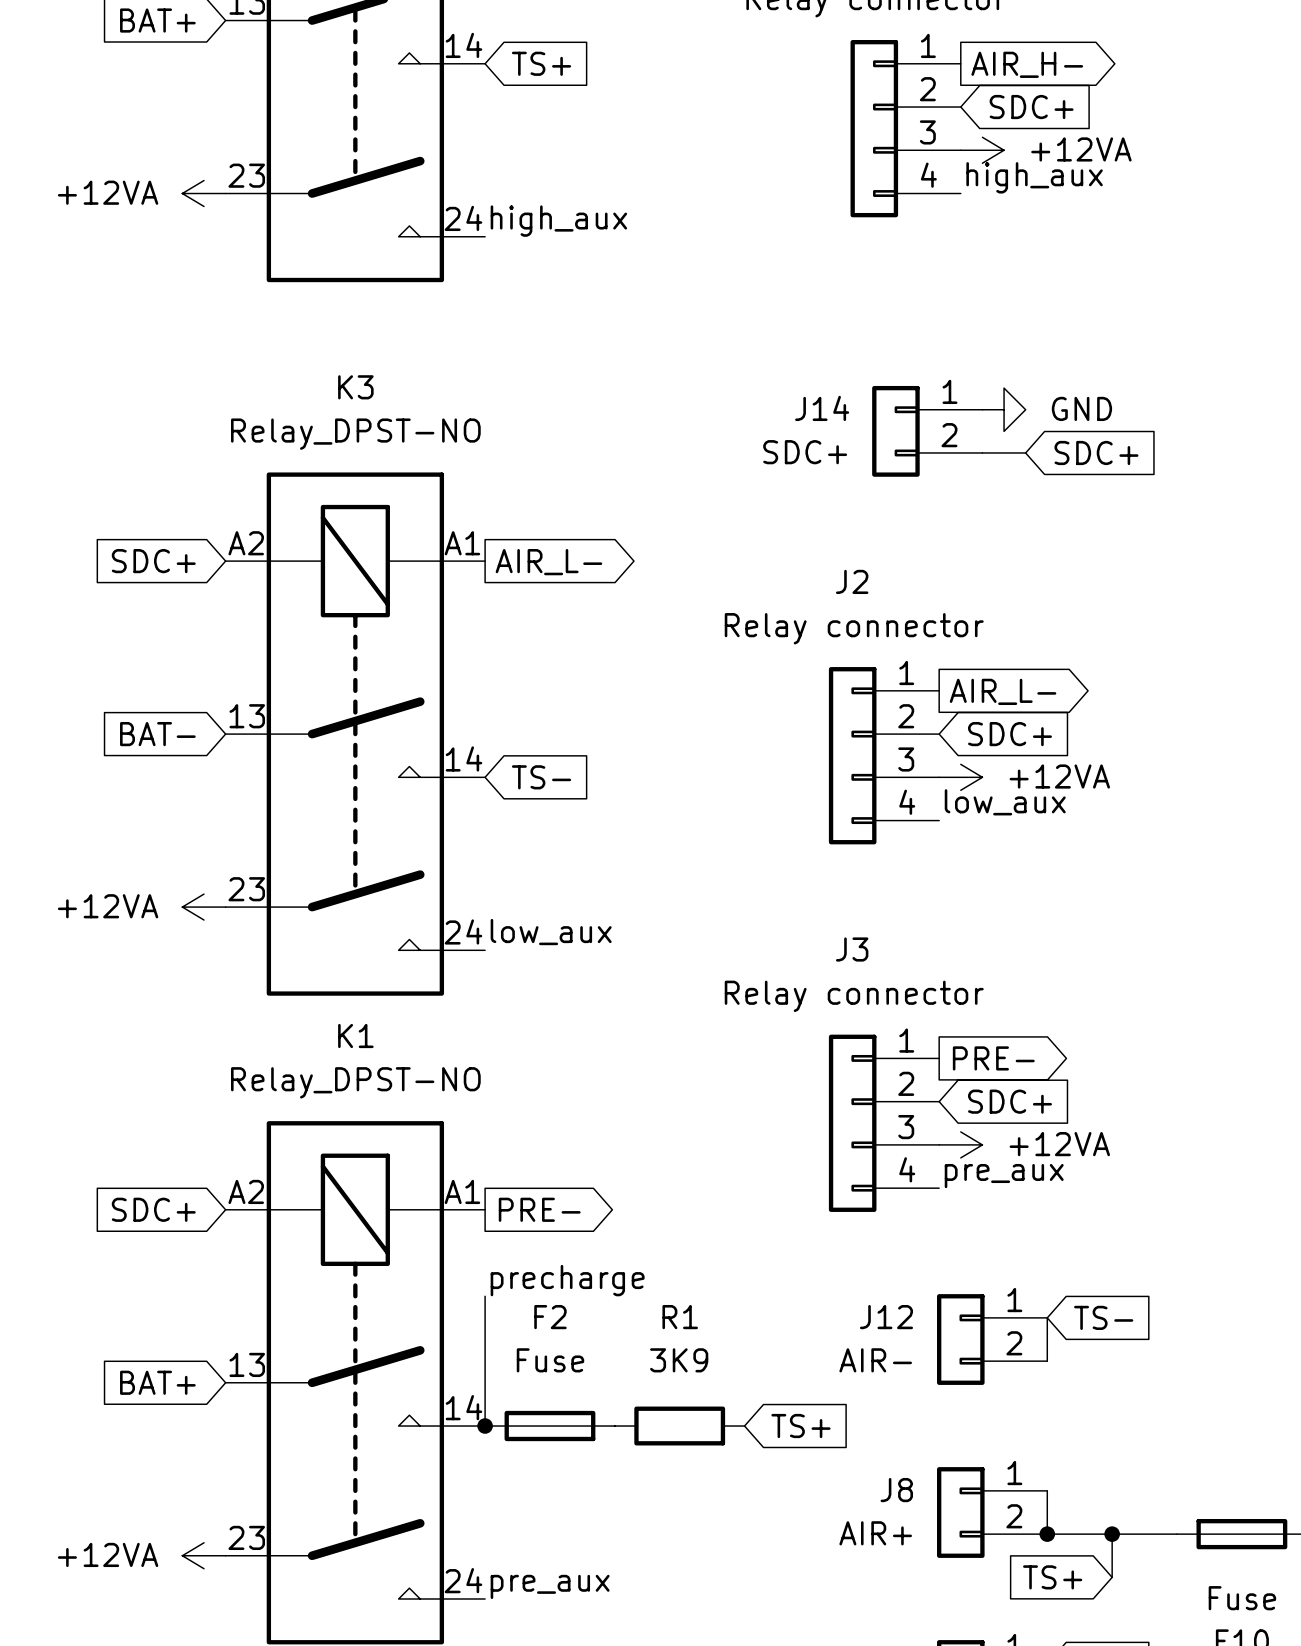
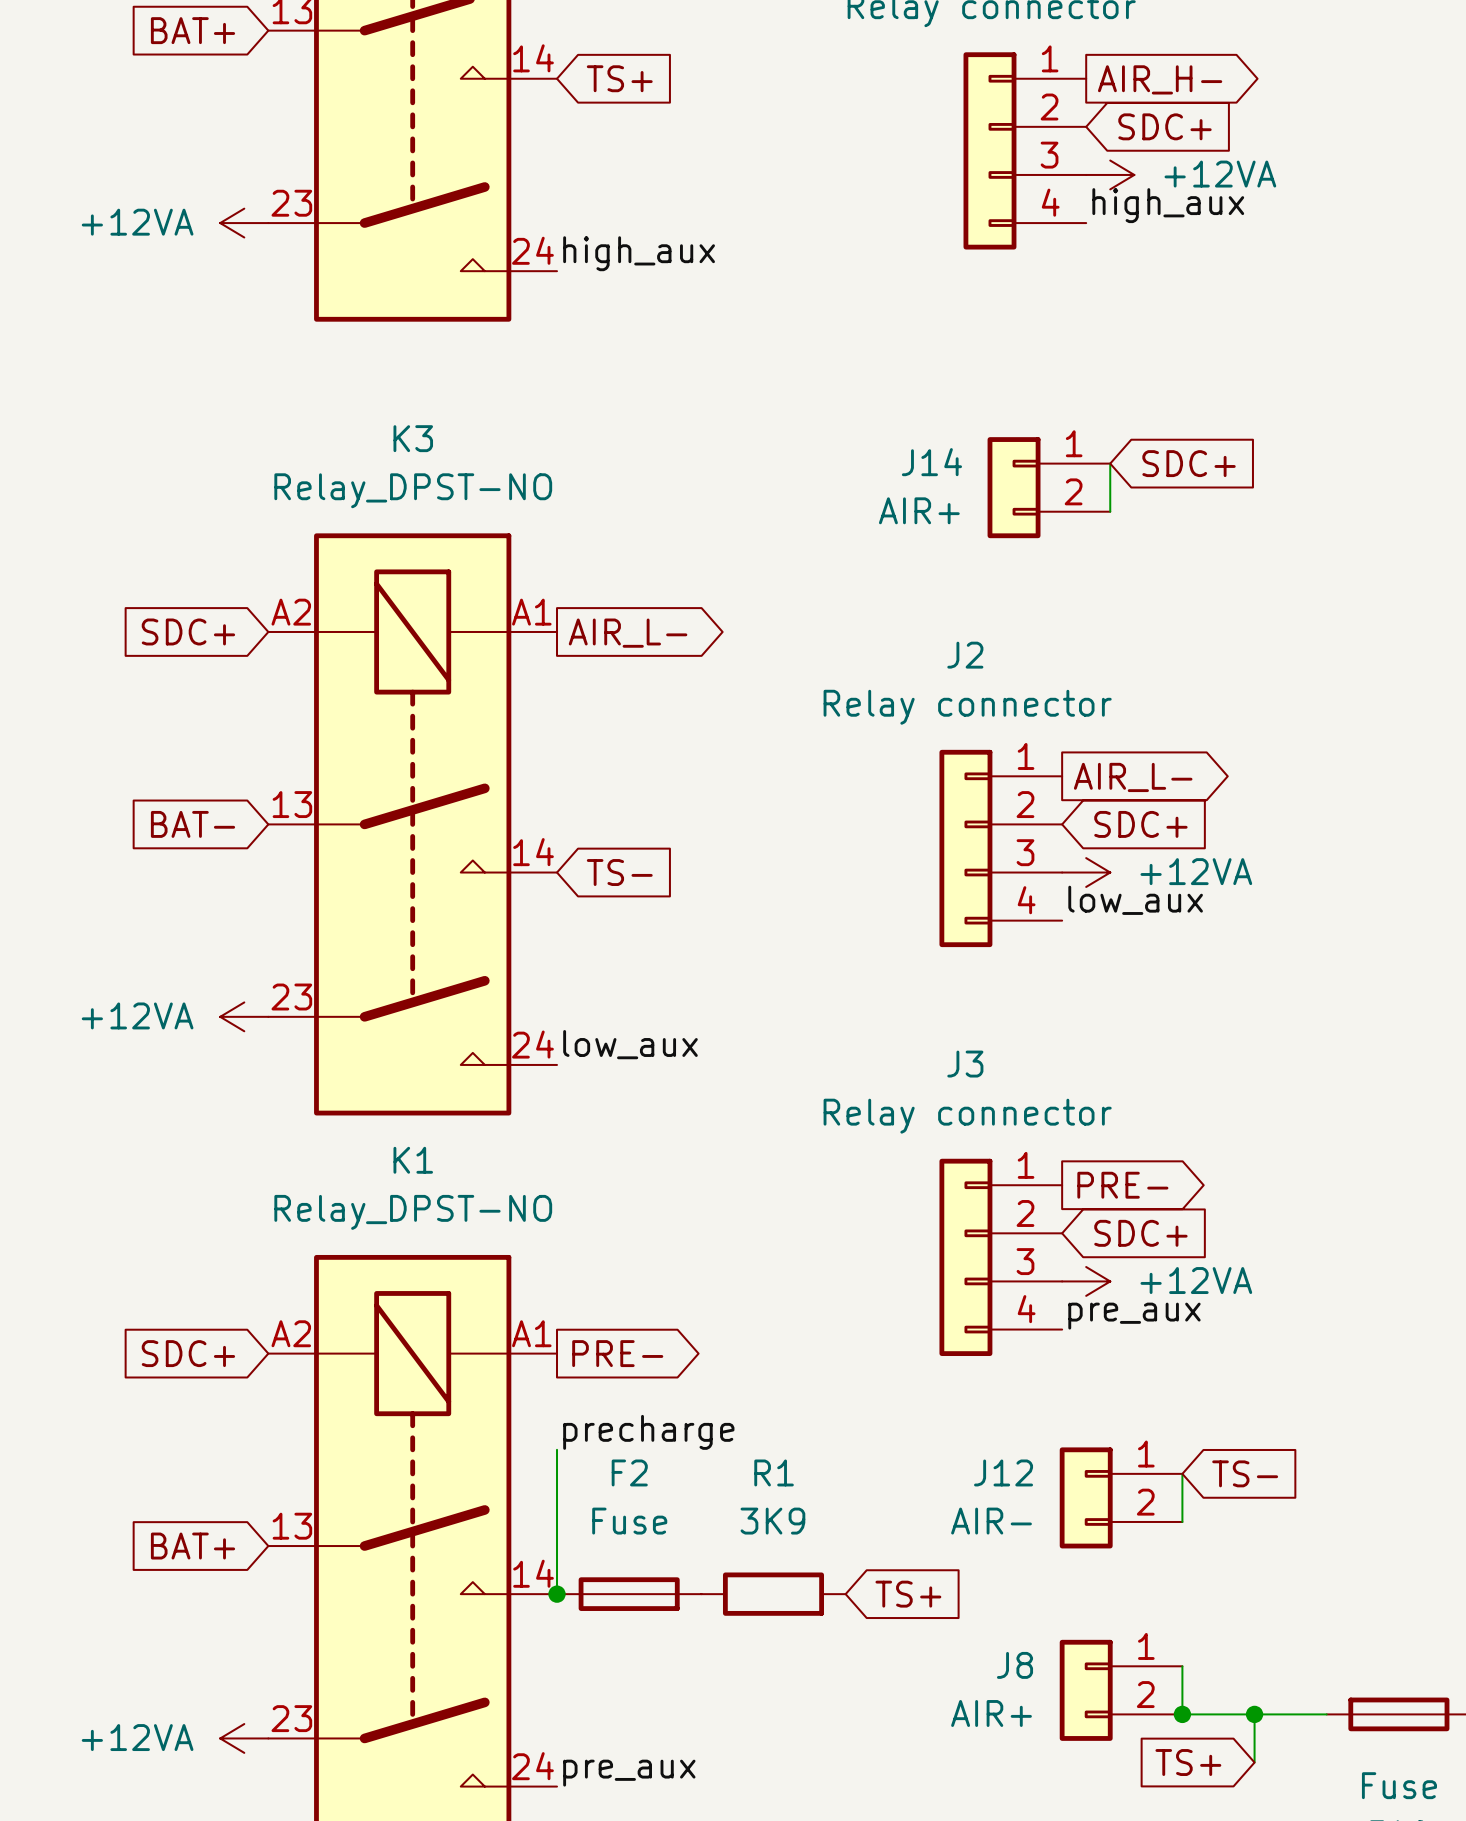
power symbol: GND (1004, 409) -> none
J14 value: SDC+ (805, 452) -> AIR+ (919, 510)
wire: (982, 452) (1025, 452) -> (1110, 511) (1110, 463)
global label position: SDC+ (1096, 452) -> SDC+ (1189, 463)

